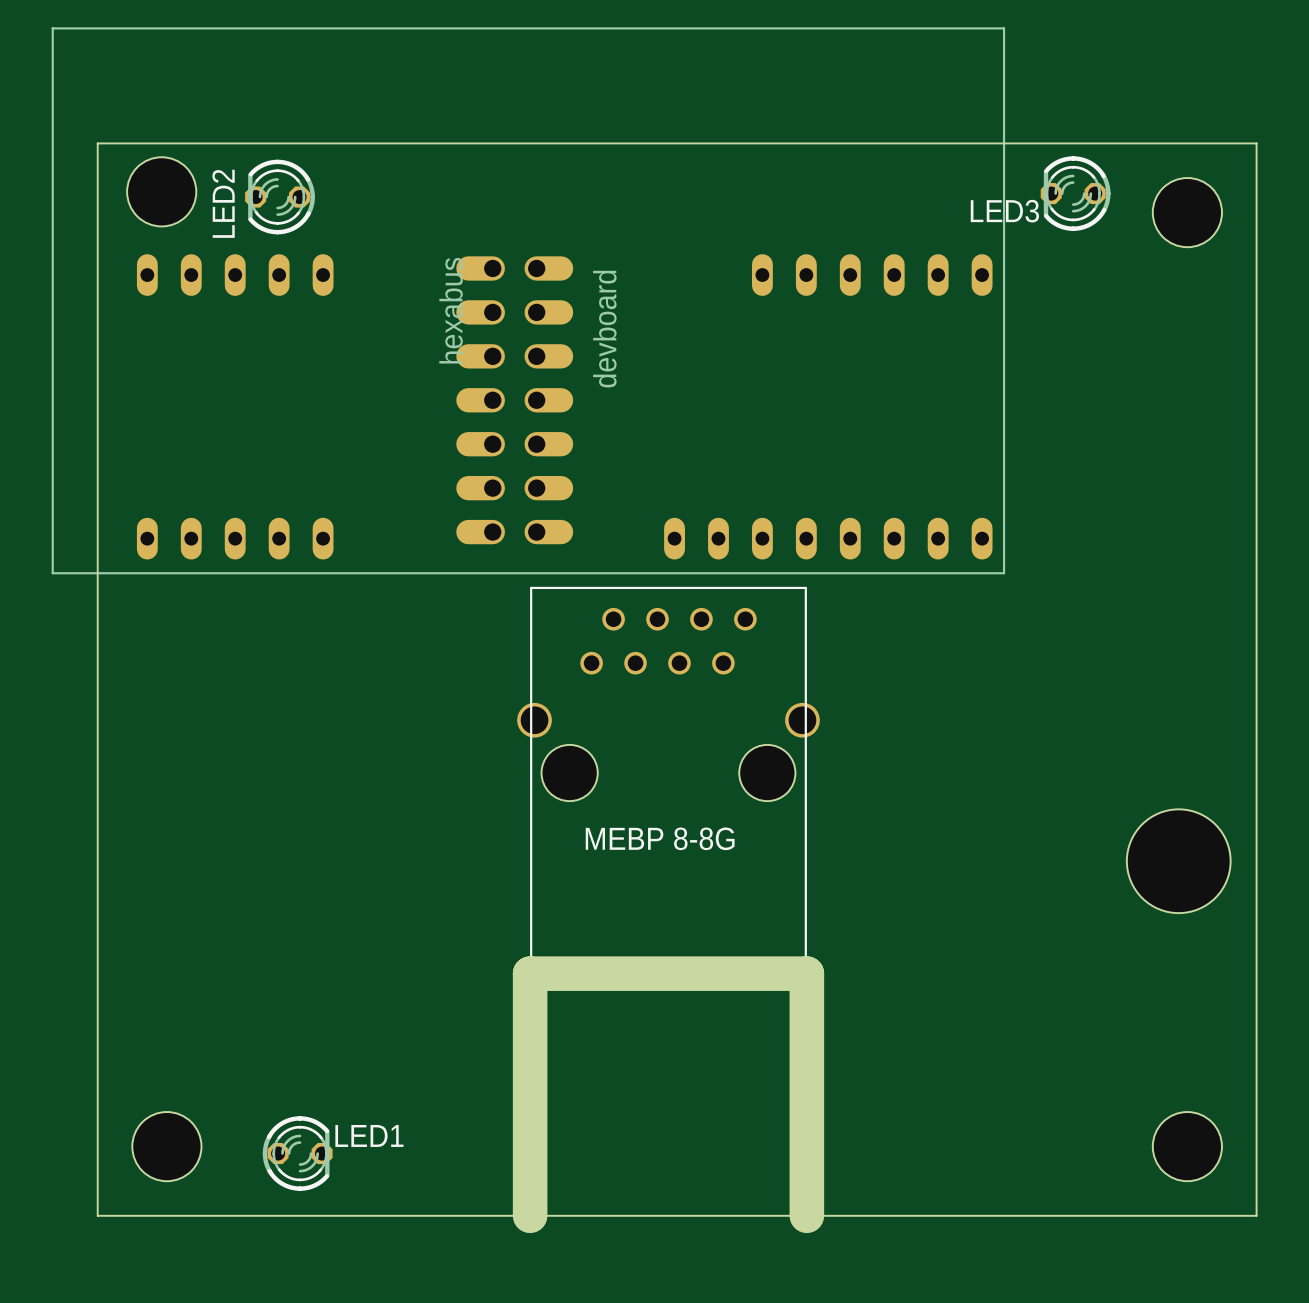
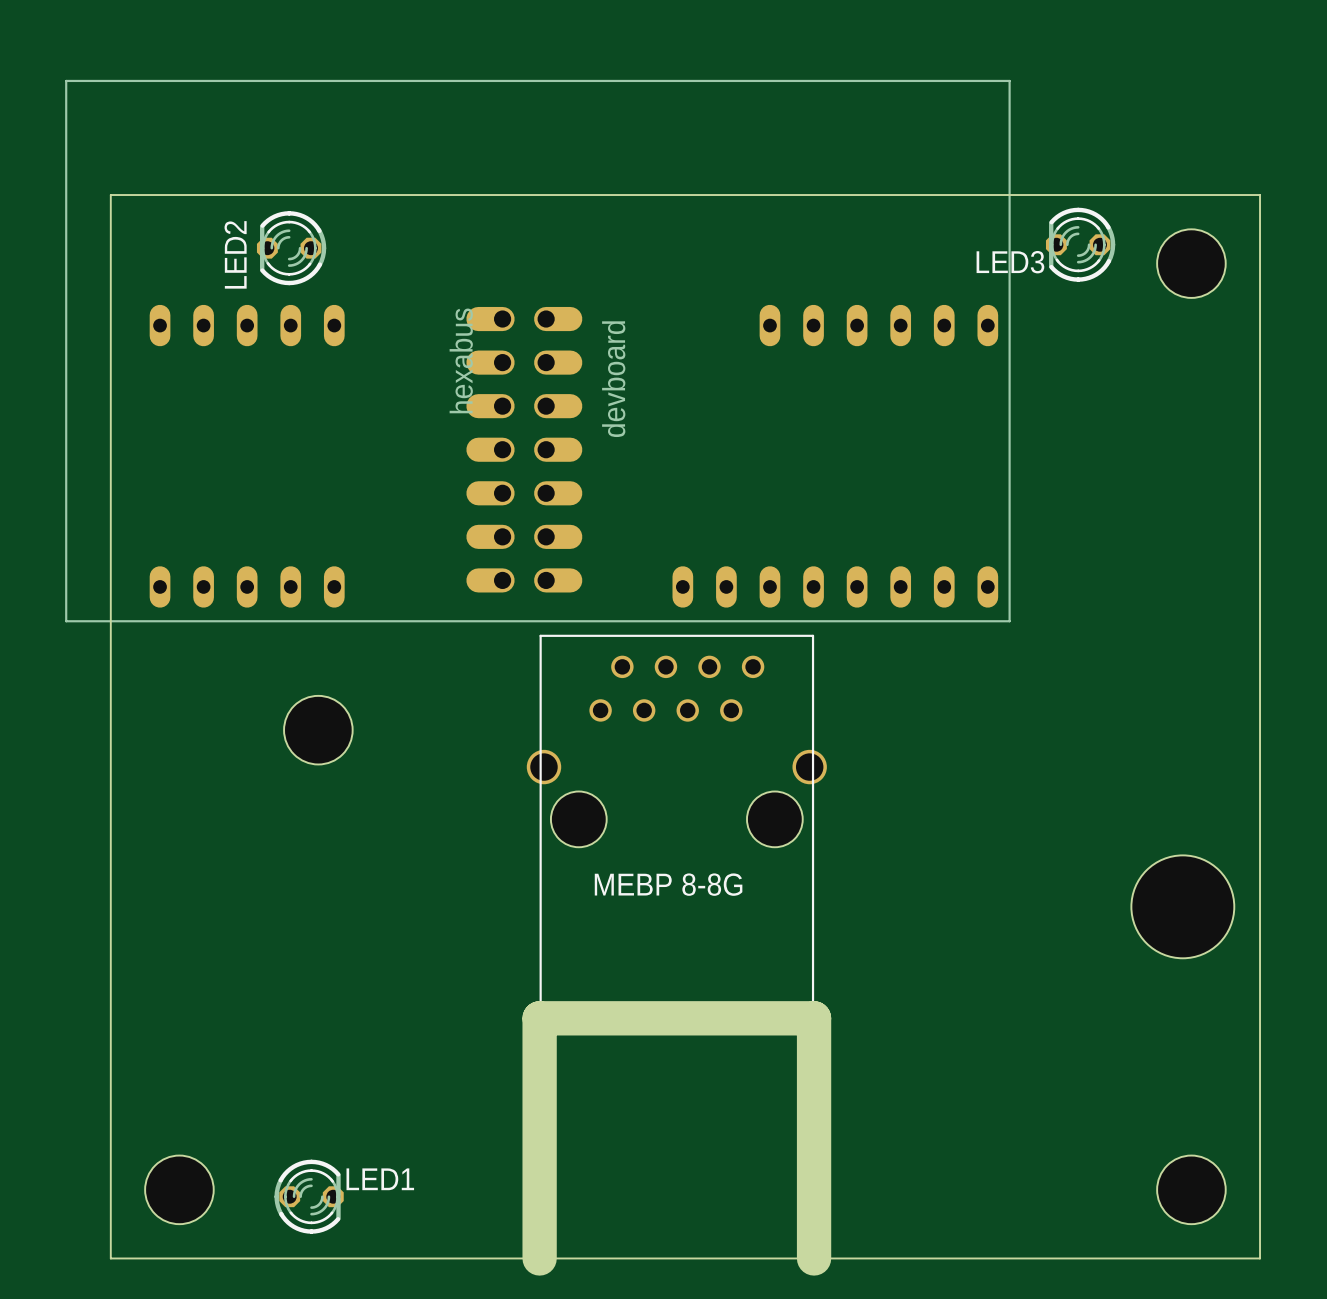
hole: (161, 191) -> none
hole: none -> (318, 730)

